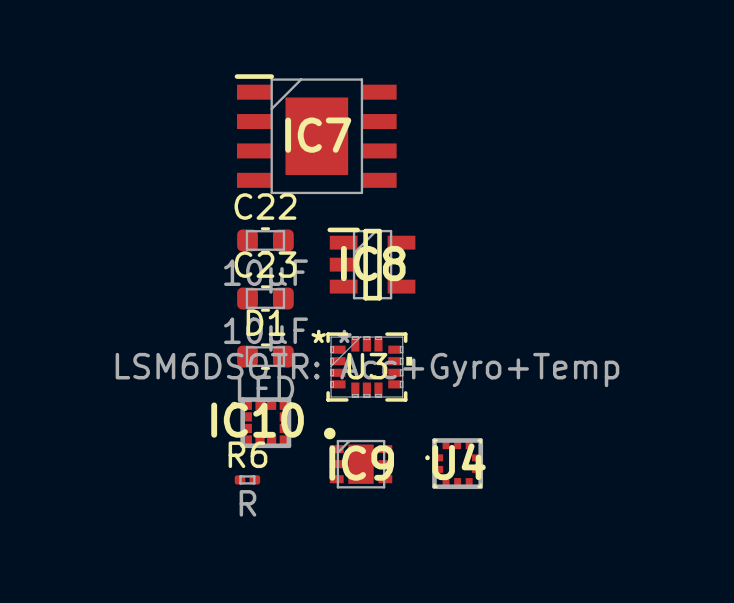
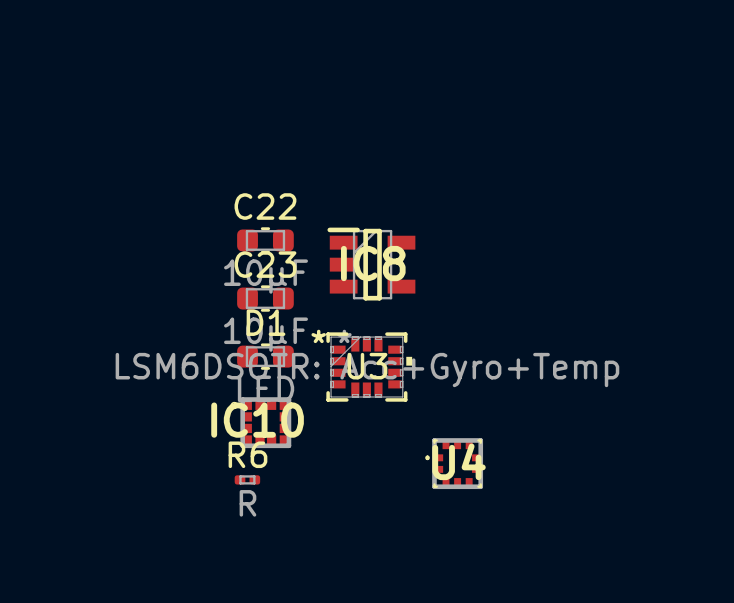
IC7: (315, 134) -> none
IC9: (358, 458) -> none

